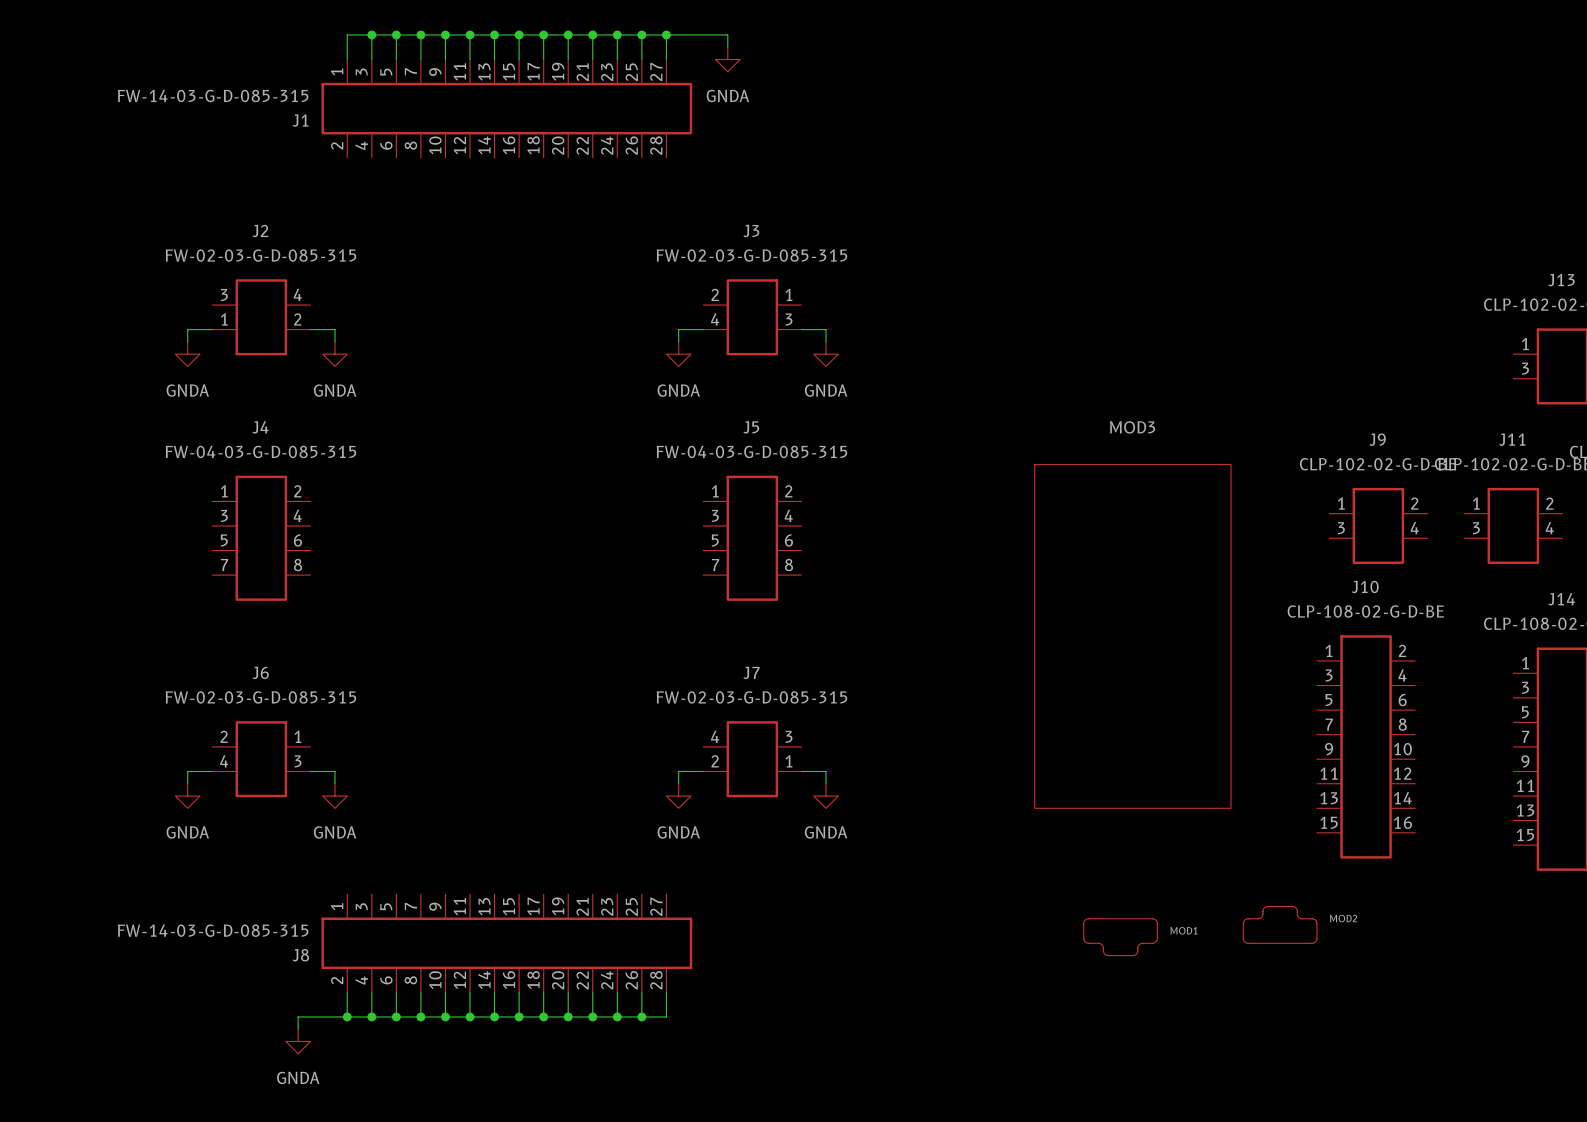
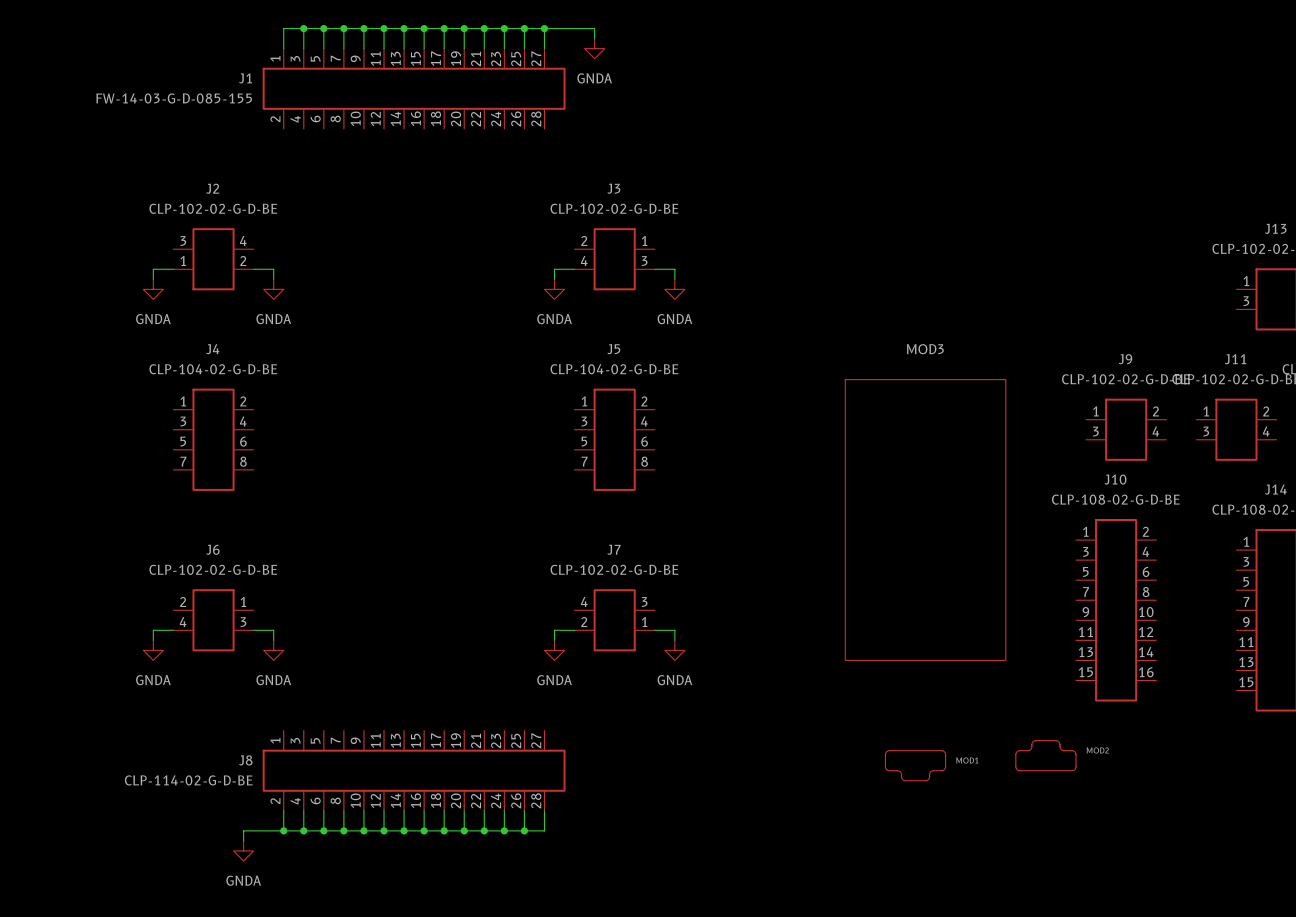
J1 value: FW-14-03-G-D-085-315 (213, 95) -> FW-14-03-G-D-085-155 (174, 98)
J1 name position: J1 (300, 120) -> J1 (245, 78)
J2 value: FW-02-03-G-D-085-315 (260, 255) -> CLP-102-02-G-D-BE (213, 208)
J3 value: FW-02-03-G-D-085-315 (751, 255) -> CLP-102-02-G-D-BE (614, 208)
J4 value: FW-04-03-G-D-085-315 (260, 451) -> CLP-104-02-G-D-BE (213, 369)
J5 value: FW-04-03-G-D-085-315 (751, 451) -> CLP-104-02-G-D-BE (614, 369)
J6 value: FW-02-03-G-D-085-315 (260, 697) -> CLP-102-02-G-D-BE (213, 569)
J7 value: FW-02-03-G-D-085-315 (751, 697) -> CLP-102-02-G-D-BE (614, 569)
J8 value: FW-14-03-G-D-085-315 (213, 930) -> CLP-114-02-G-D-BE (188, 780)
J8 name position: J8 (300, 955) -> J8 (245, 760)

